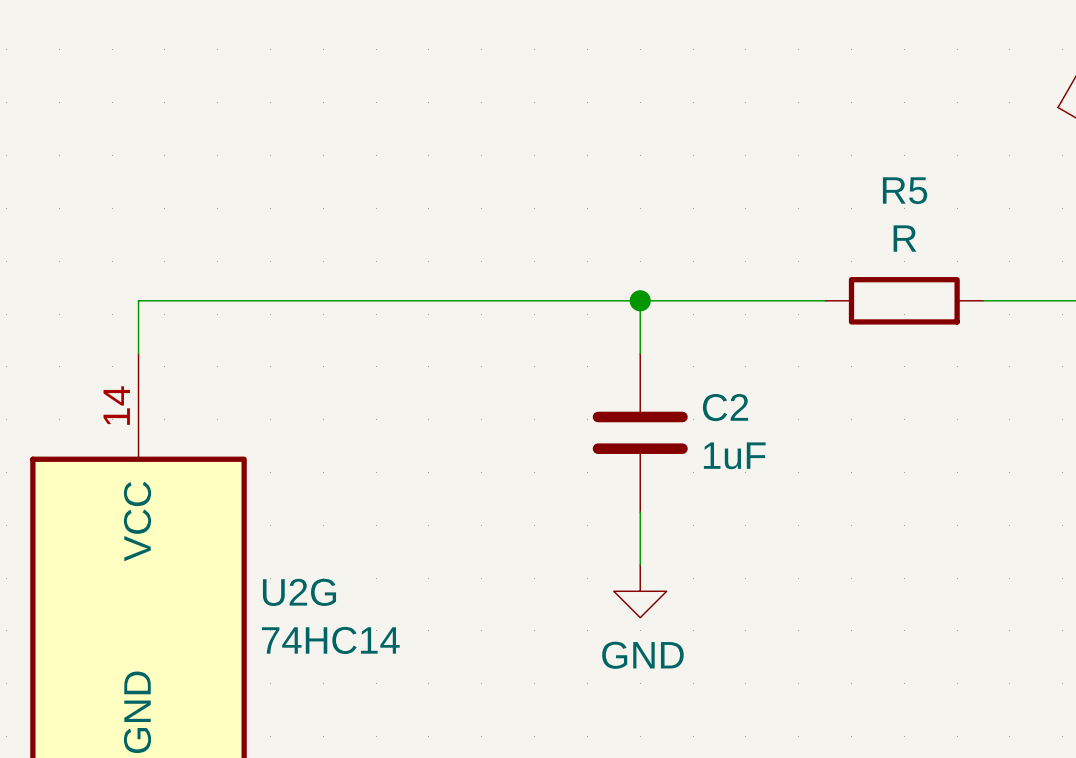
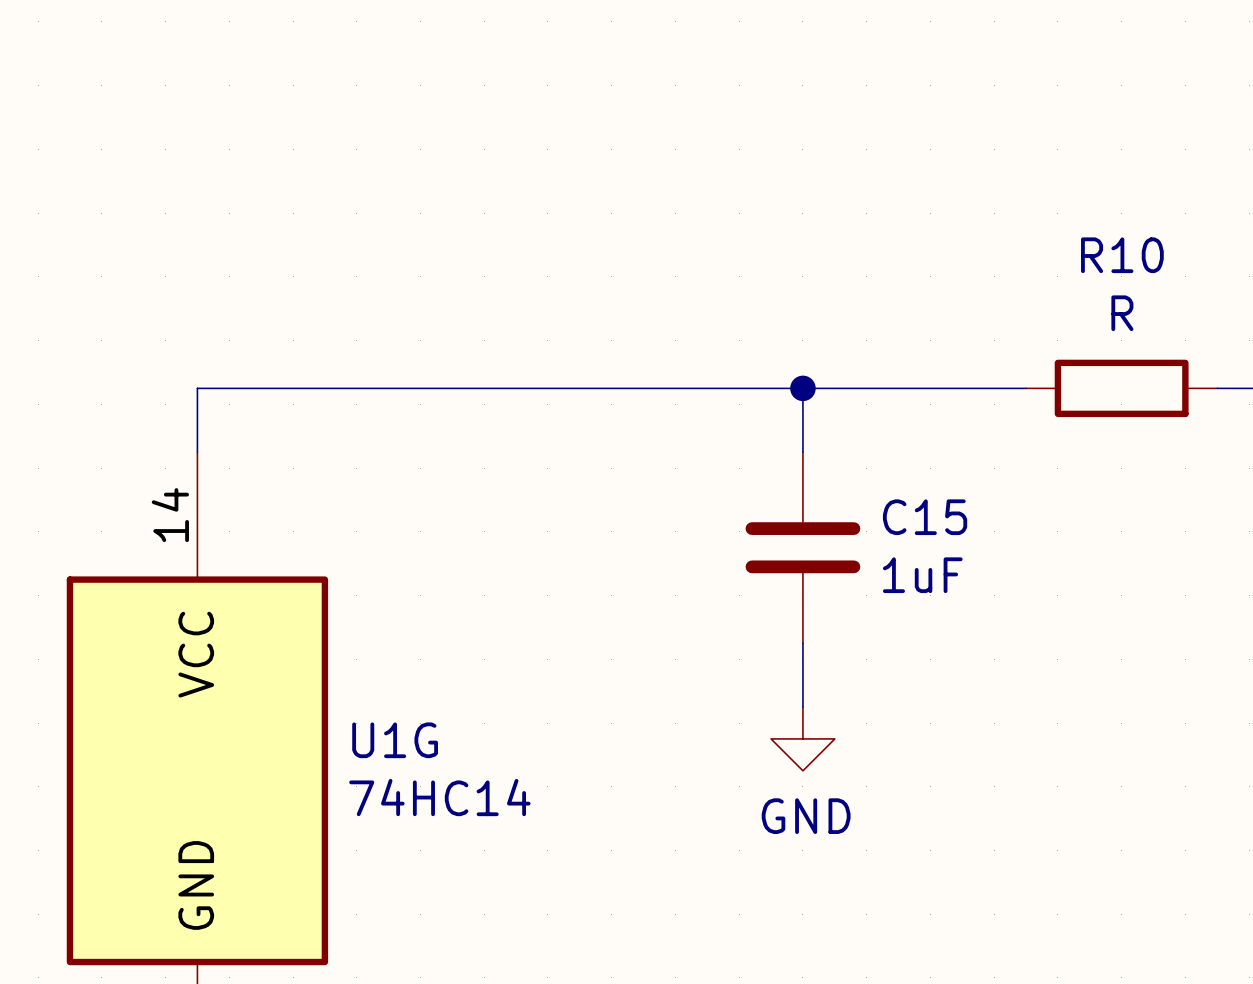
R5 name: R5 (905, 190) -> R10 (1122, 255)
C2 name: C2 (725, 407) -> C15 (925, 517)
U2G name: U2G (299, 592) -> U1G (395, 740)

